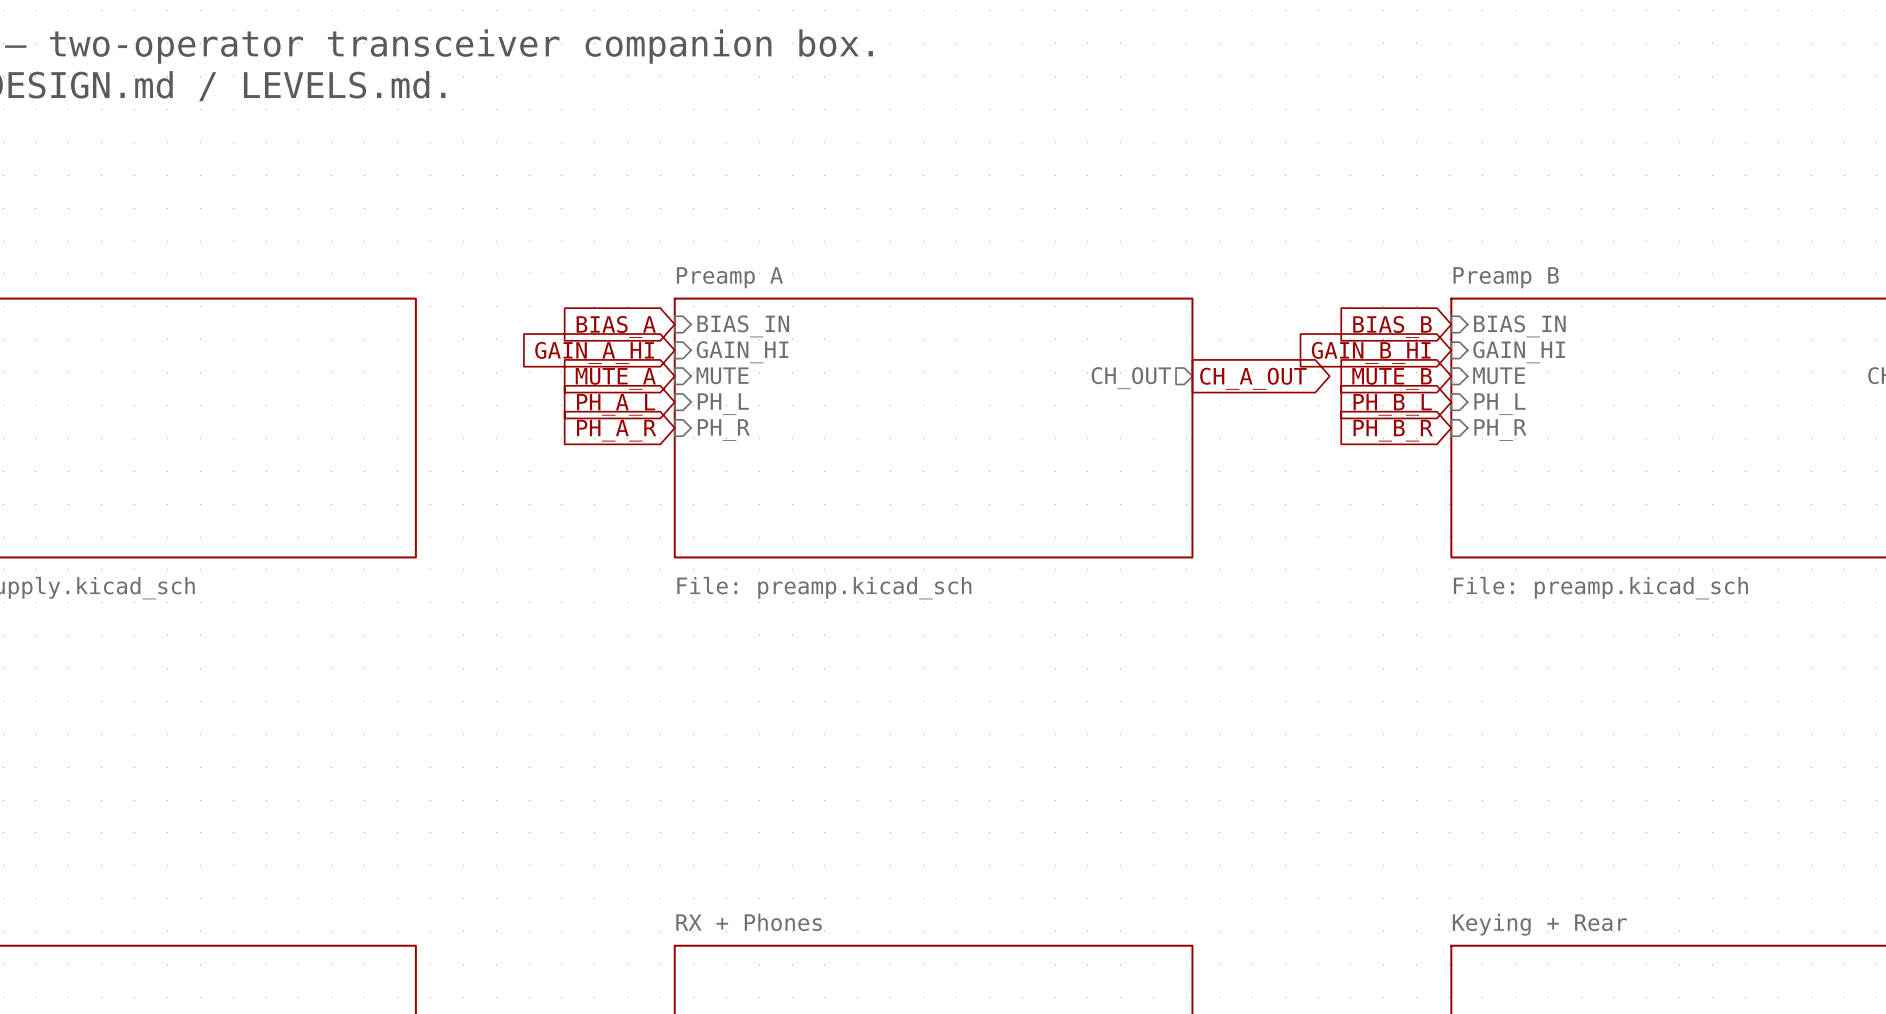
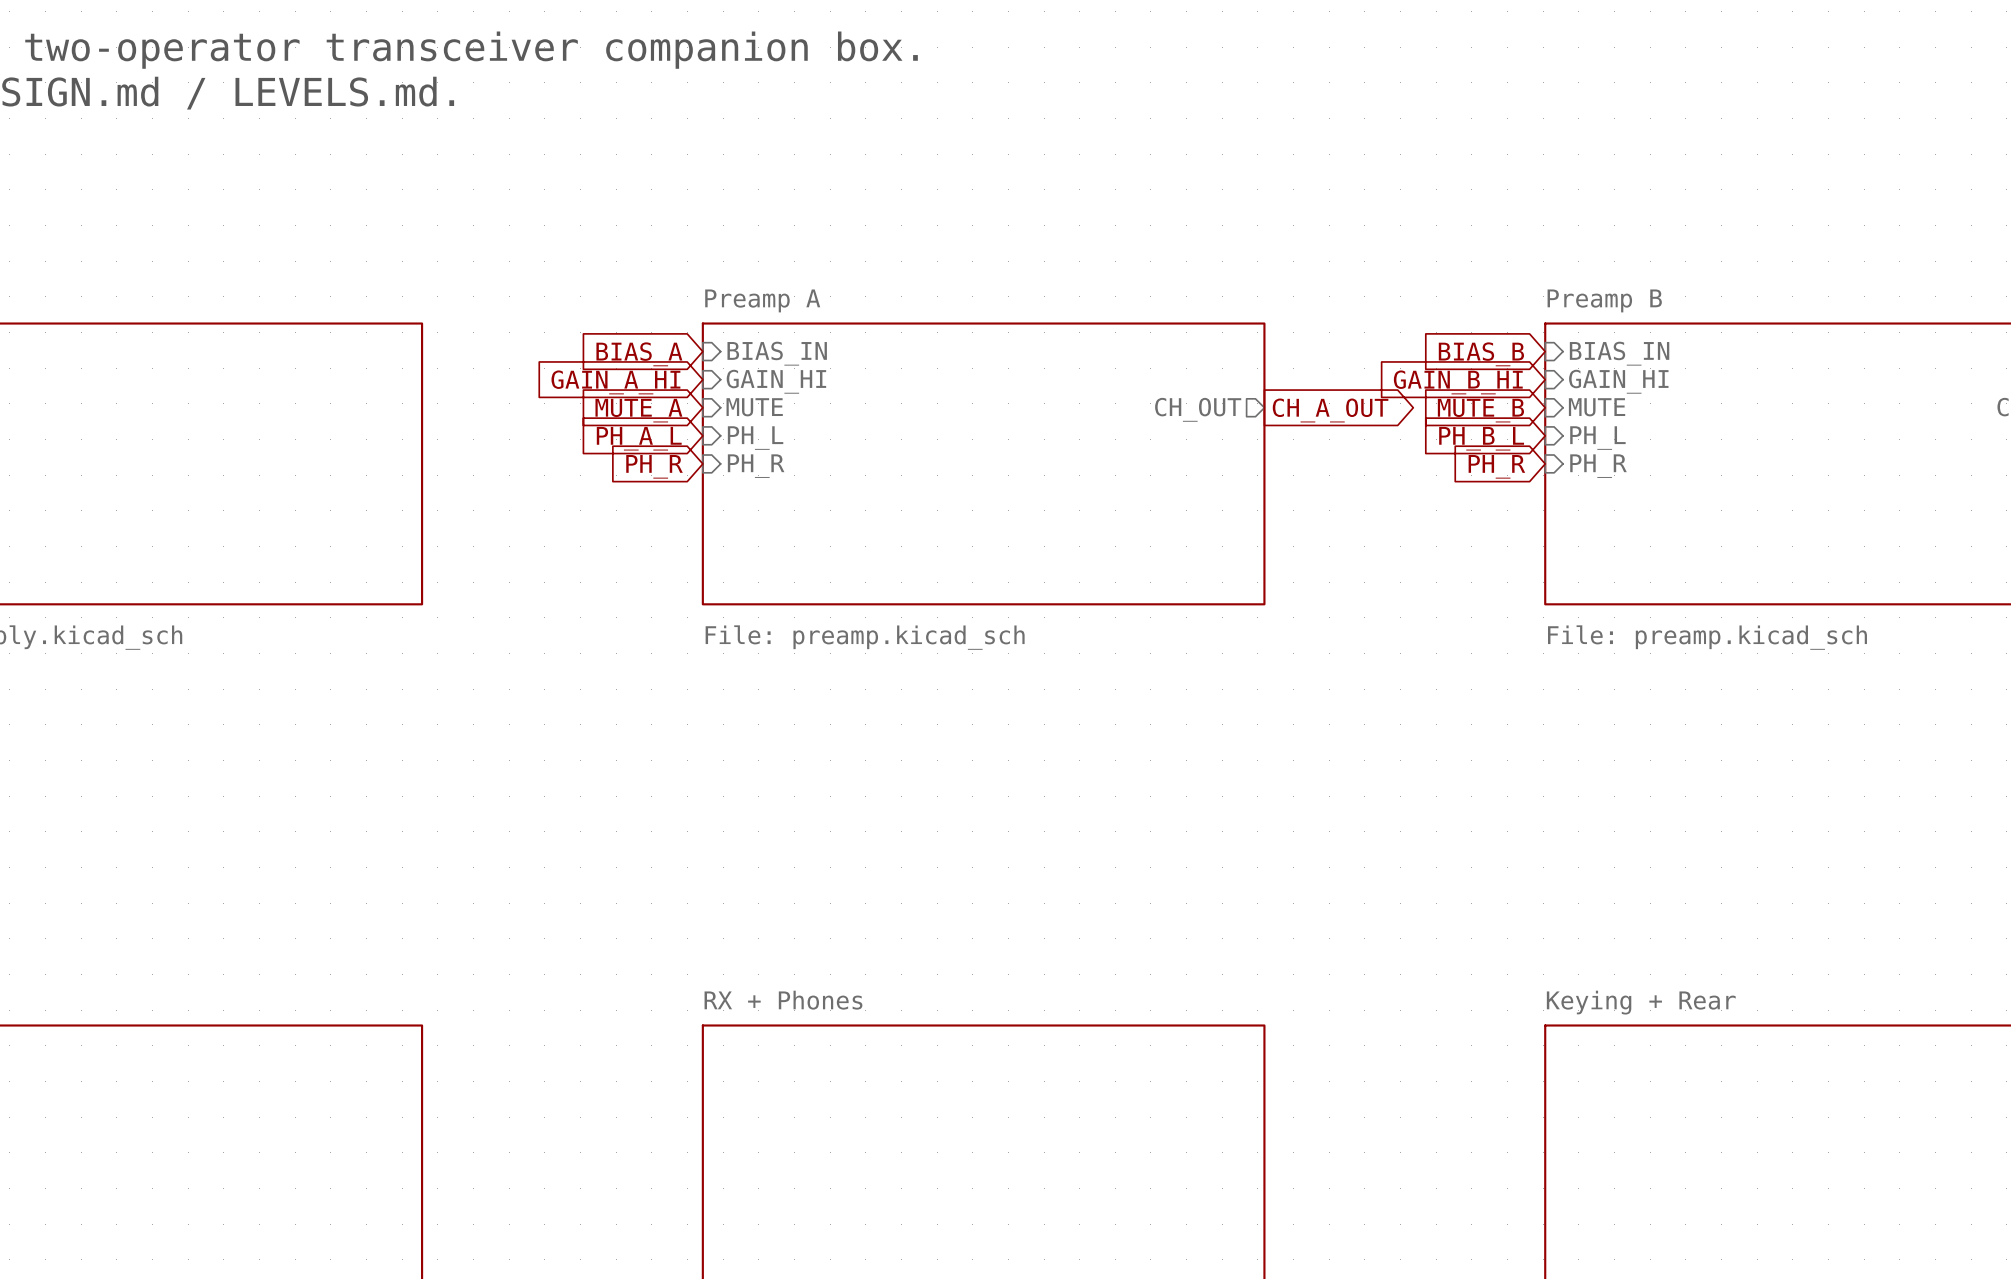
global label: PH_A_R (616, 430) -> PH_R (654, 466)
global label: PH_B_R (1393, 430) -> PH_R (1496, 466)

